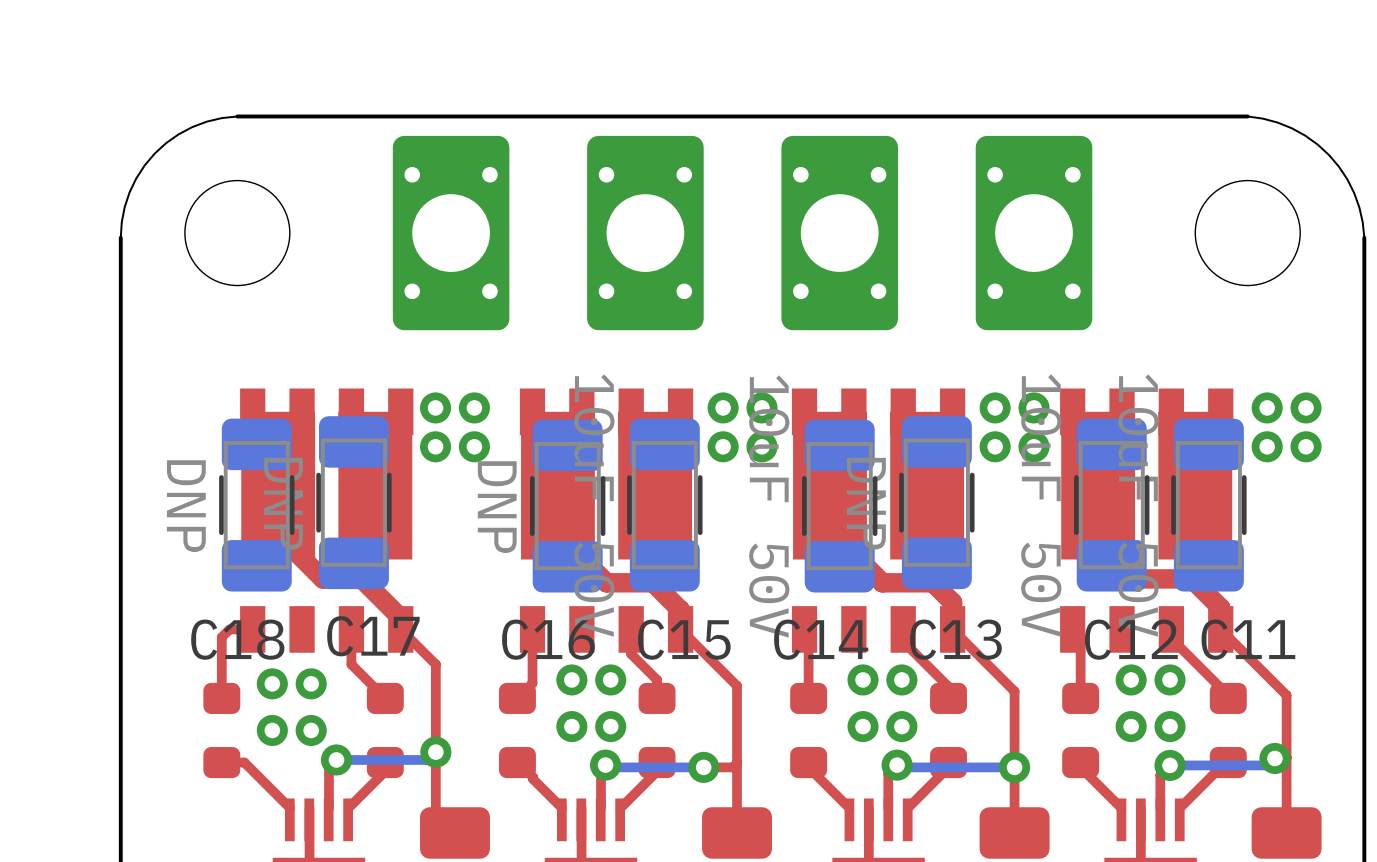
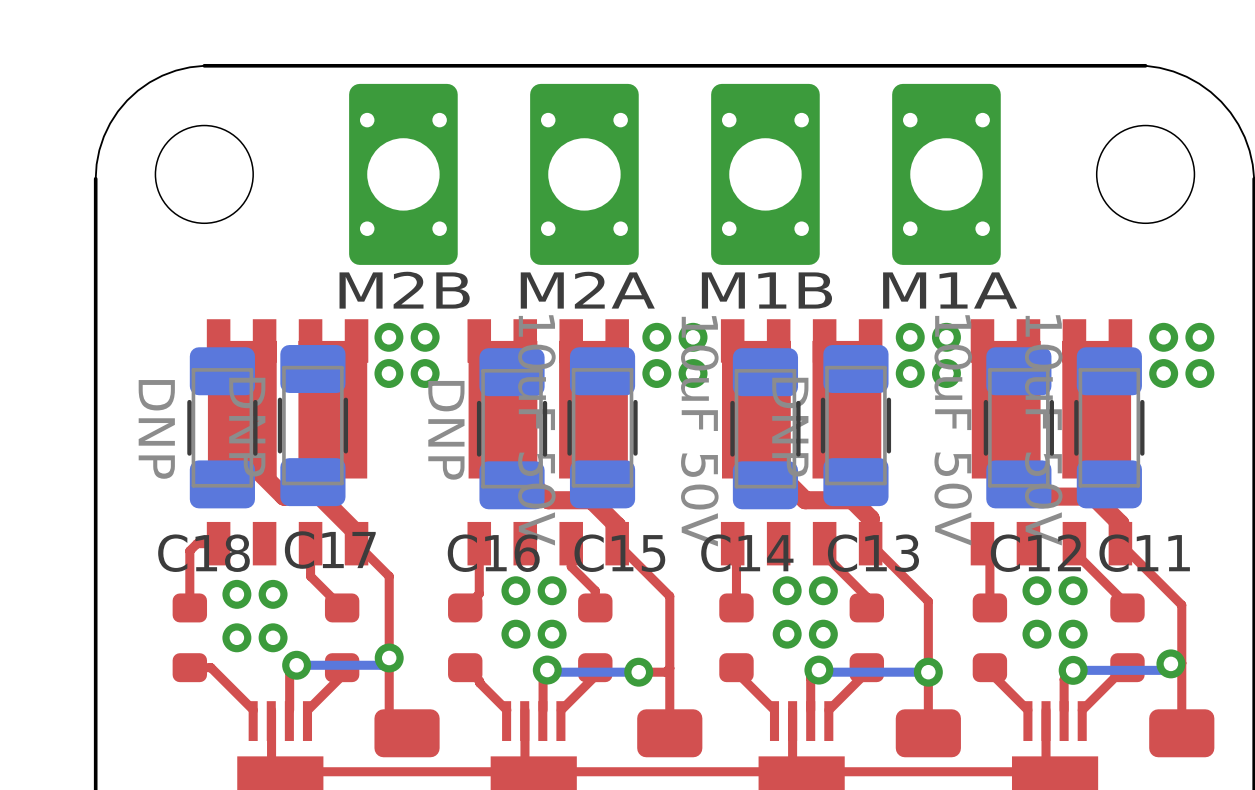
text: none -> M2B (404, 290)
text: none -> M2A (587, 290)
text: none -> M1B (766, 290)
text: none -> M1A (950, 290)

